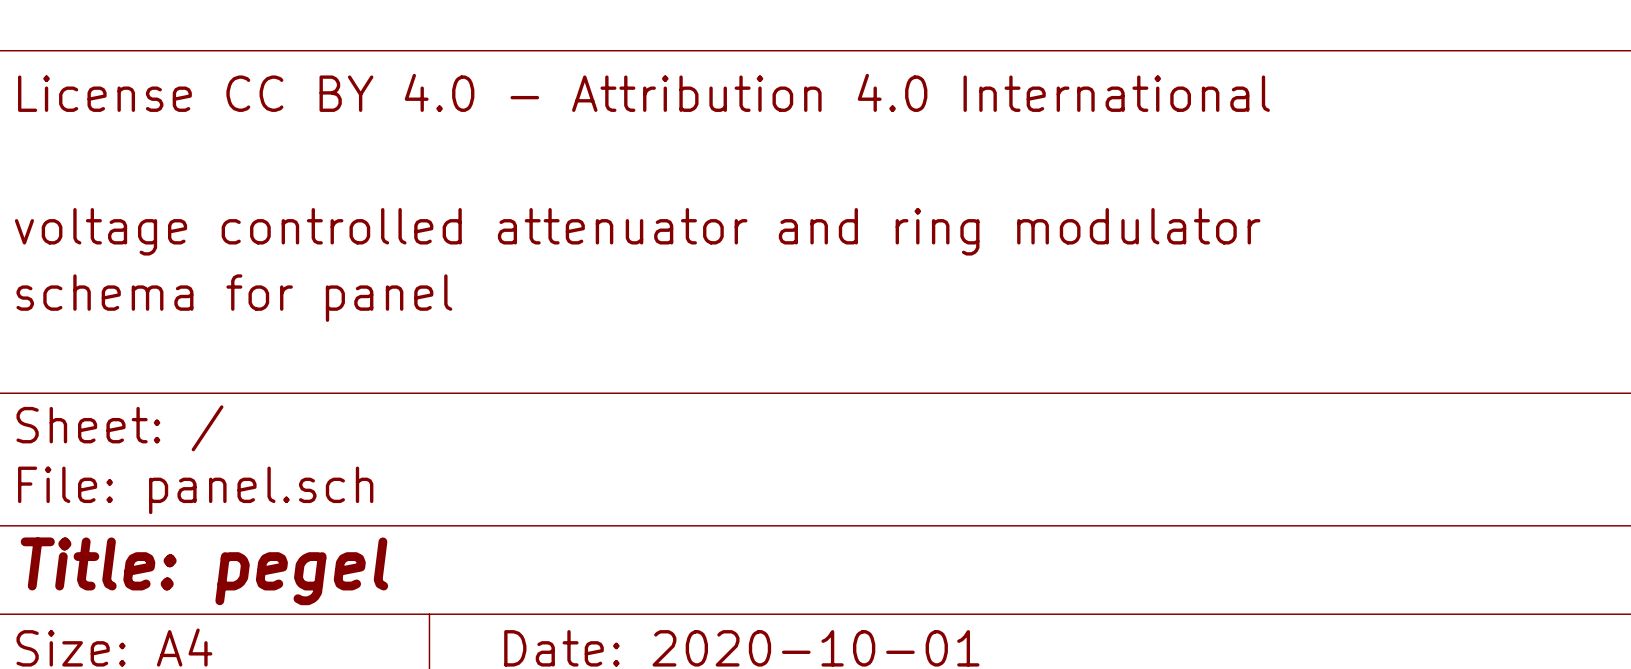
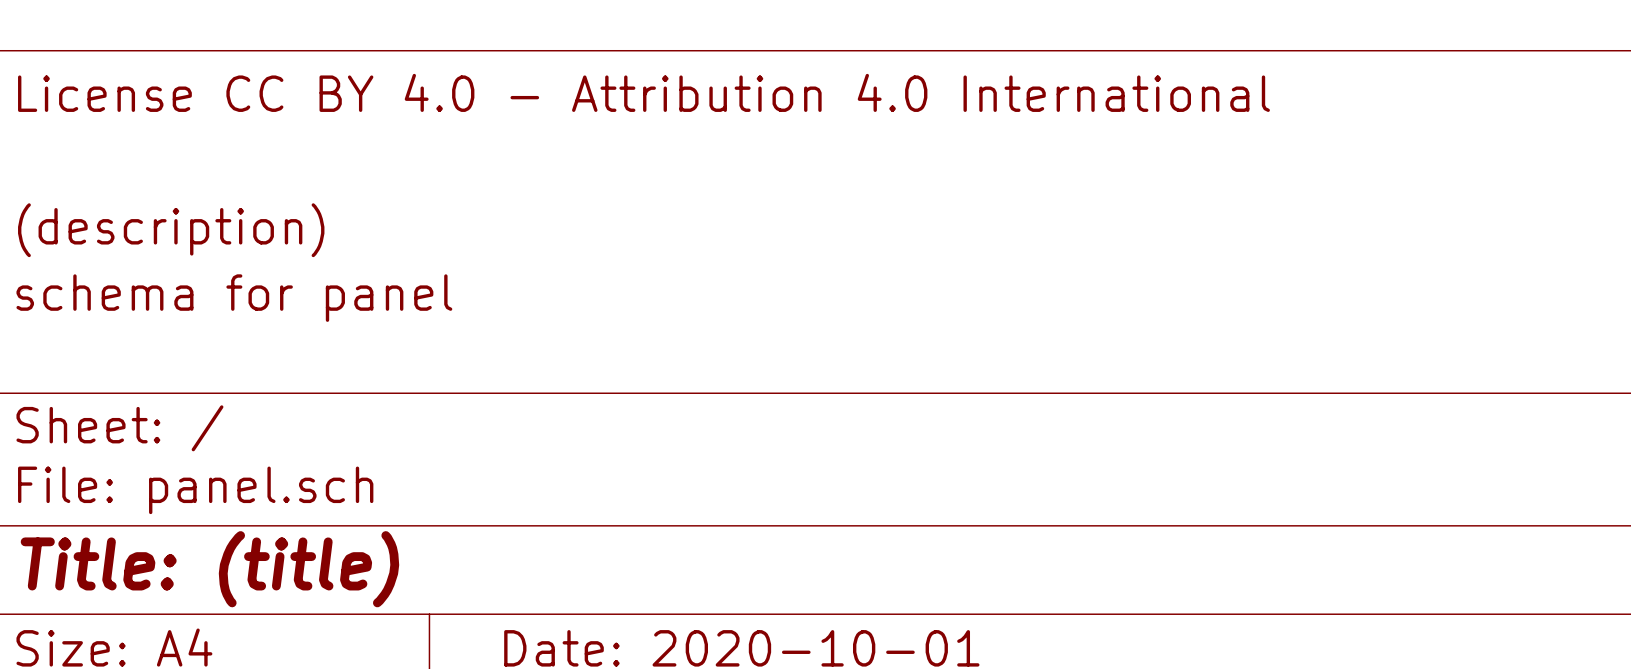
title block: voltage controlled attenuator and ring modulator (637, 231) -> (description) (171, 230)
title block: Title: pegel (204, 571) -> Title: (title) (209, 569)

